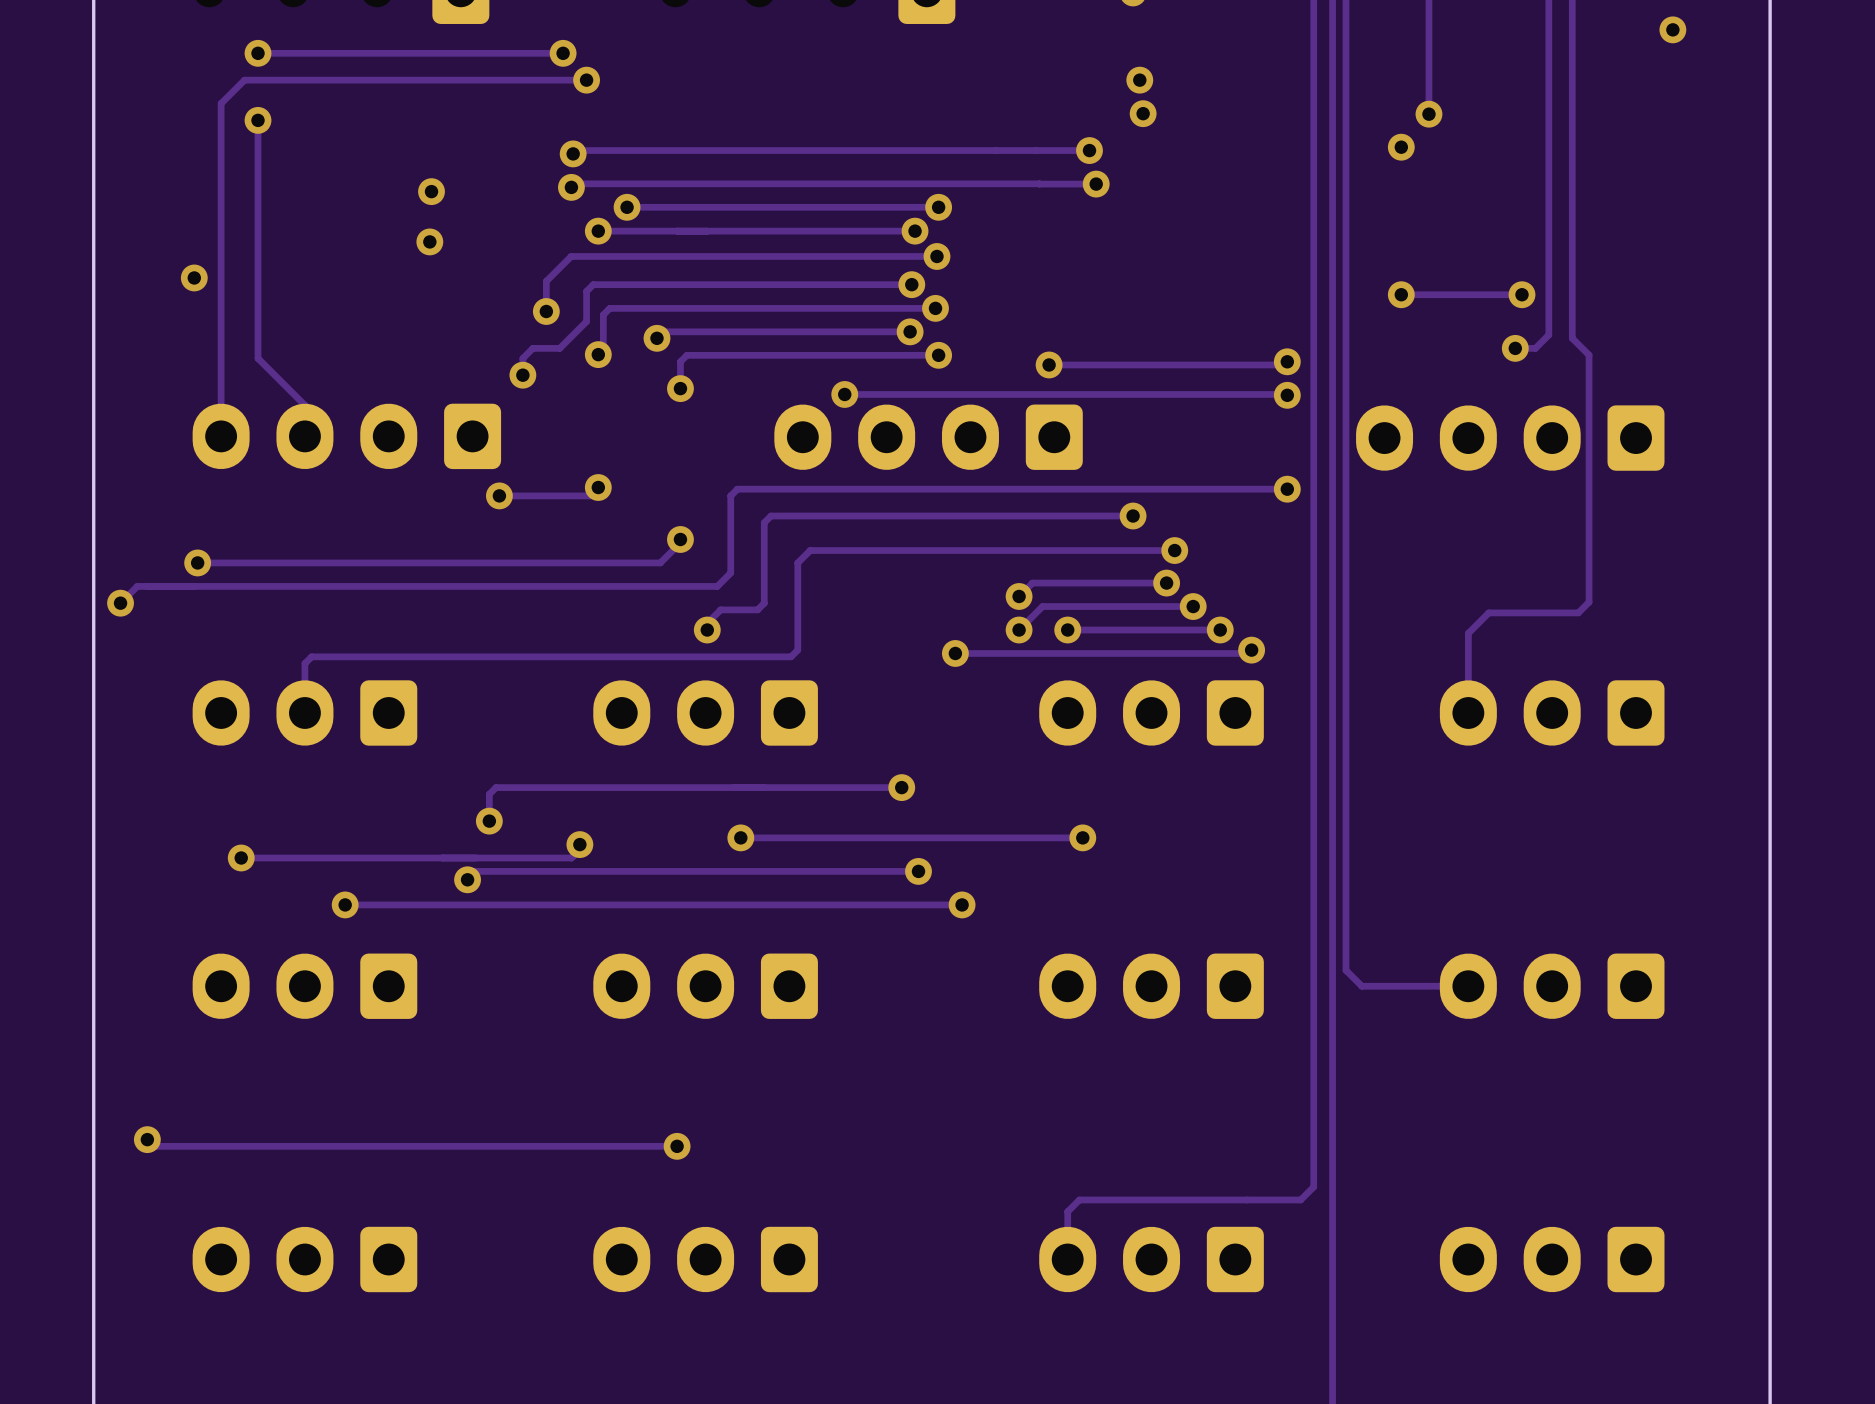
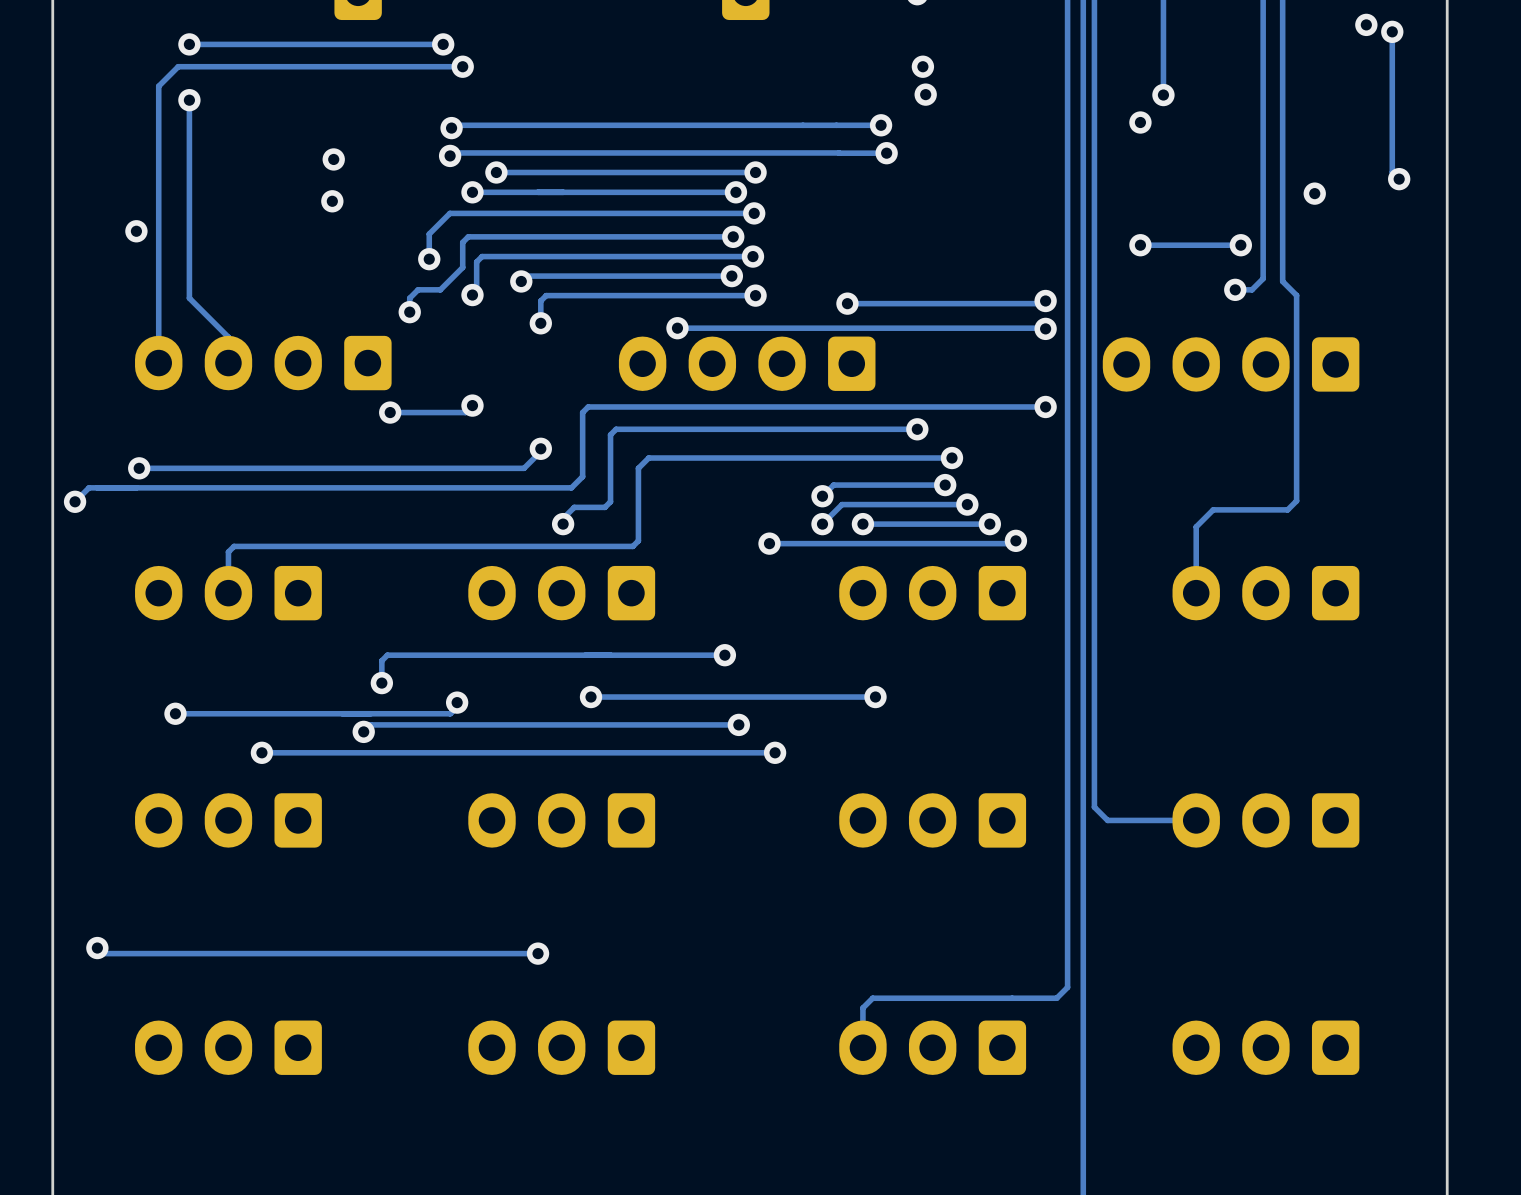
track: none -> (1392, 31) (1392, 172) (1399, 179)
via: none -> (1392, 31)
via: none -> (1399, 179)
via: none -> (1314, 193)

